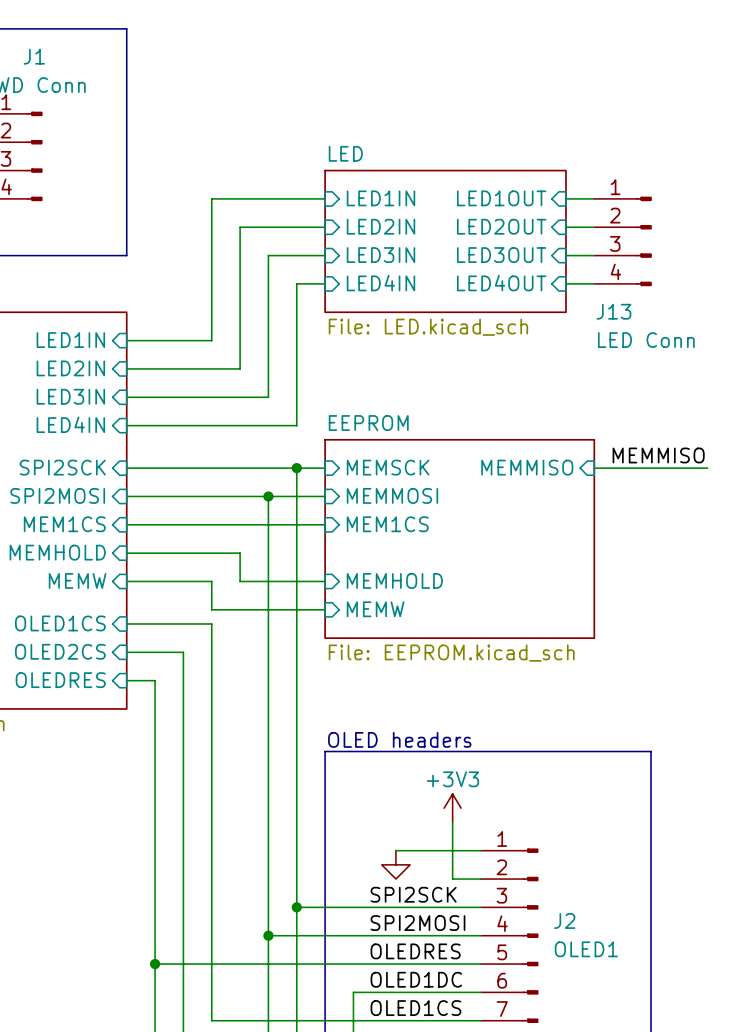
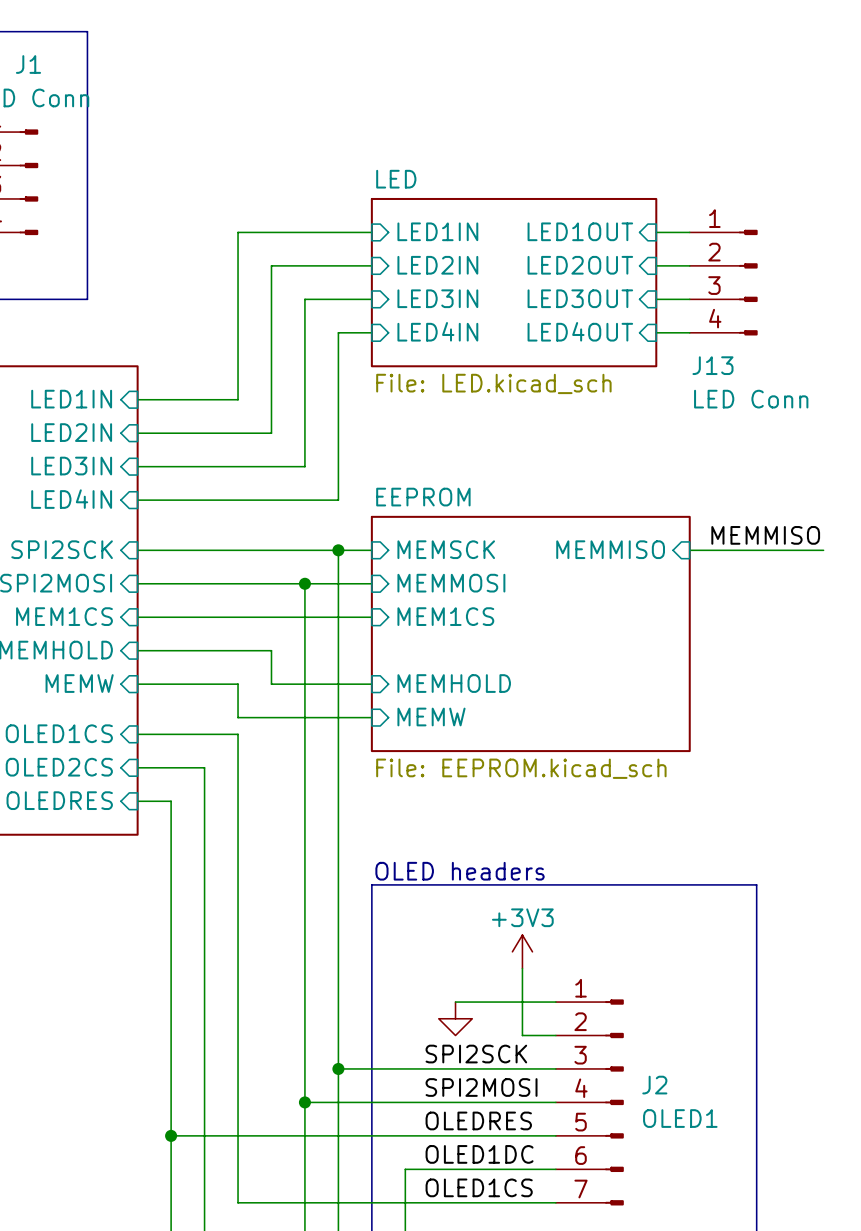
line: (84, 28) (126, 28) (126, 255) (84, 255) -> (87, 31) (87, 299)

